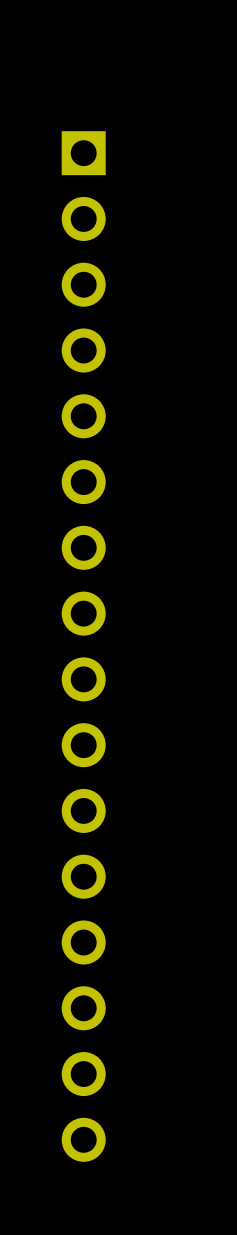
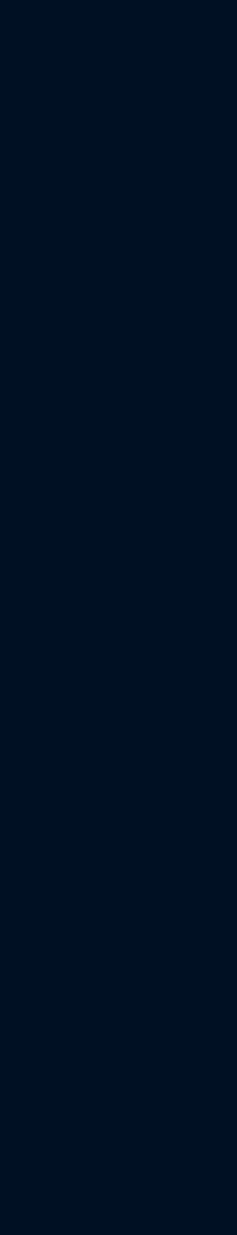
part: (83, 646) -> none

